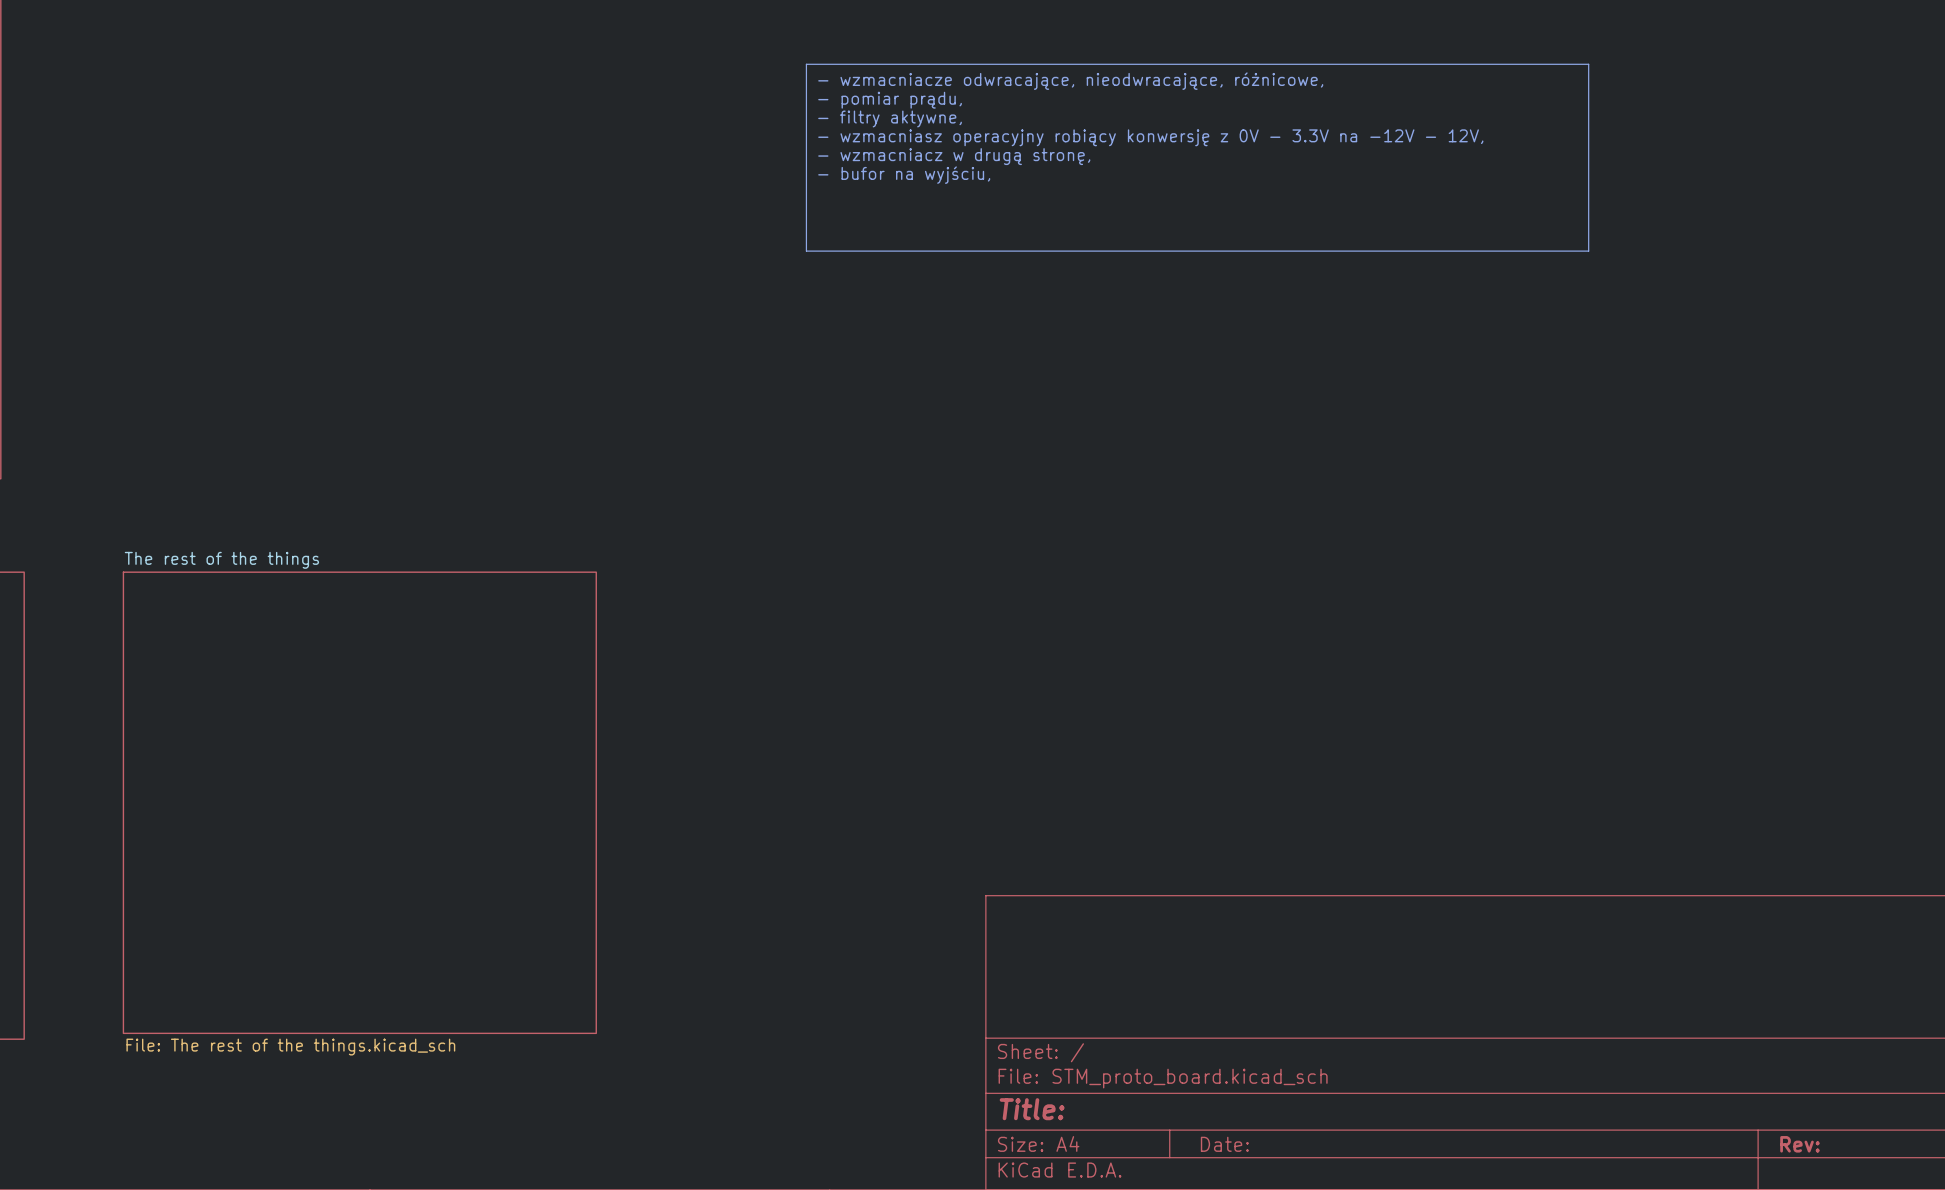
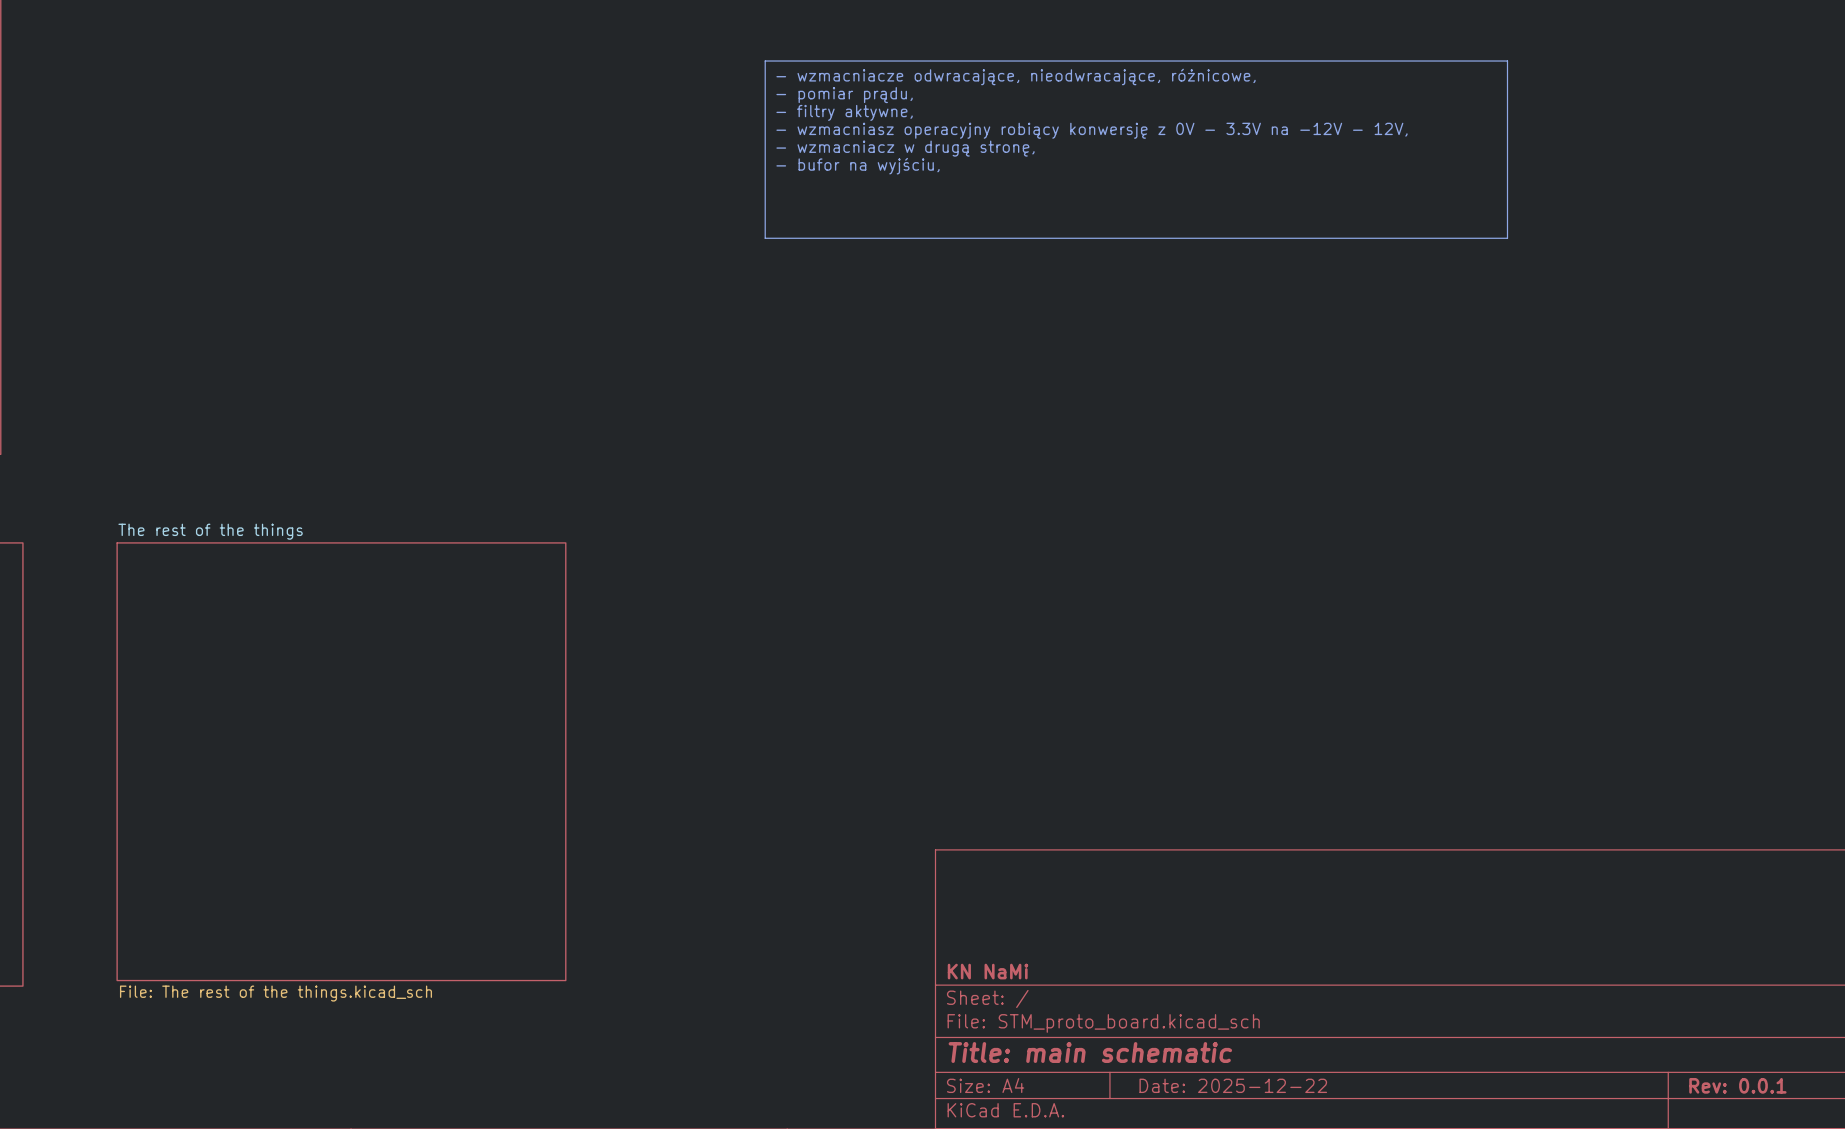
title block: none -> KN NaMi (988, 971)
title block: Title: (1032, 1109) -> Title: main schematic (1090, 1052)
title block: Date: (1224, 1144) -> Date: 2025-12-22 (1233, 1085)
title block: Rev: (1799, 1144) -> Rev: 0.0.1 (1737, 1085)

